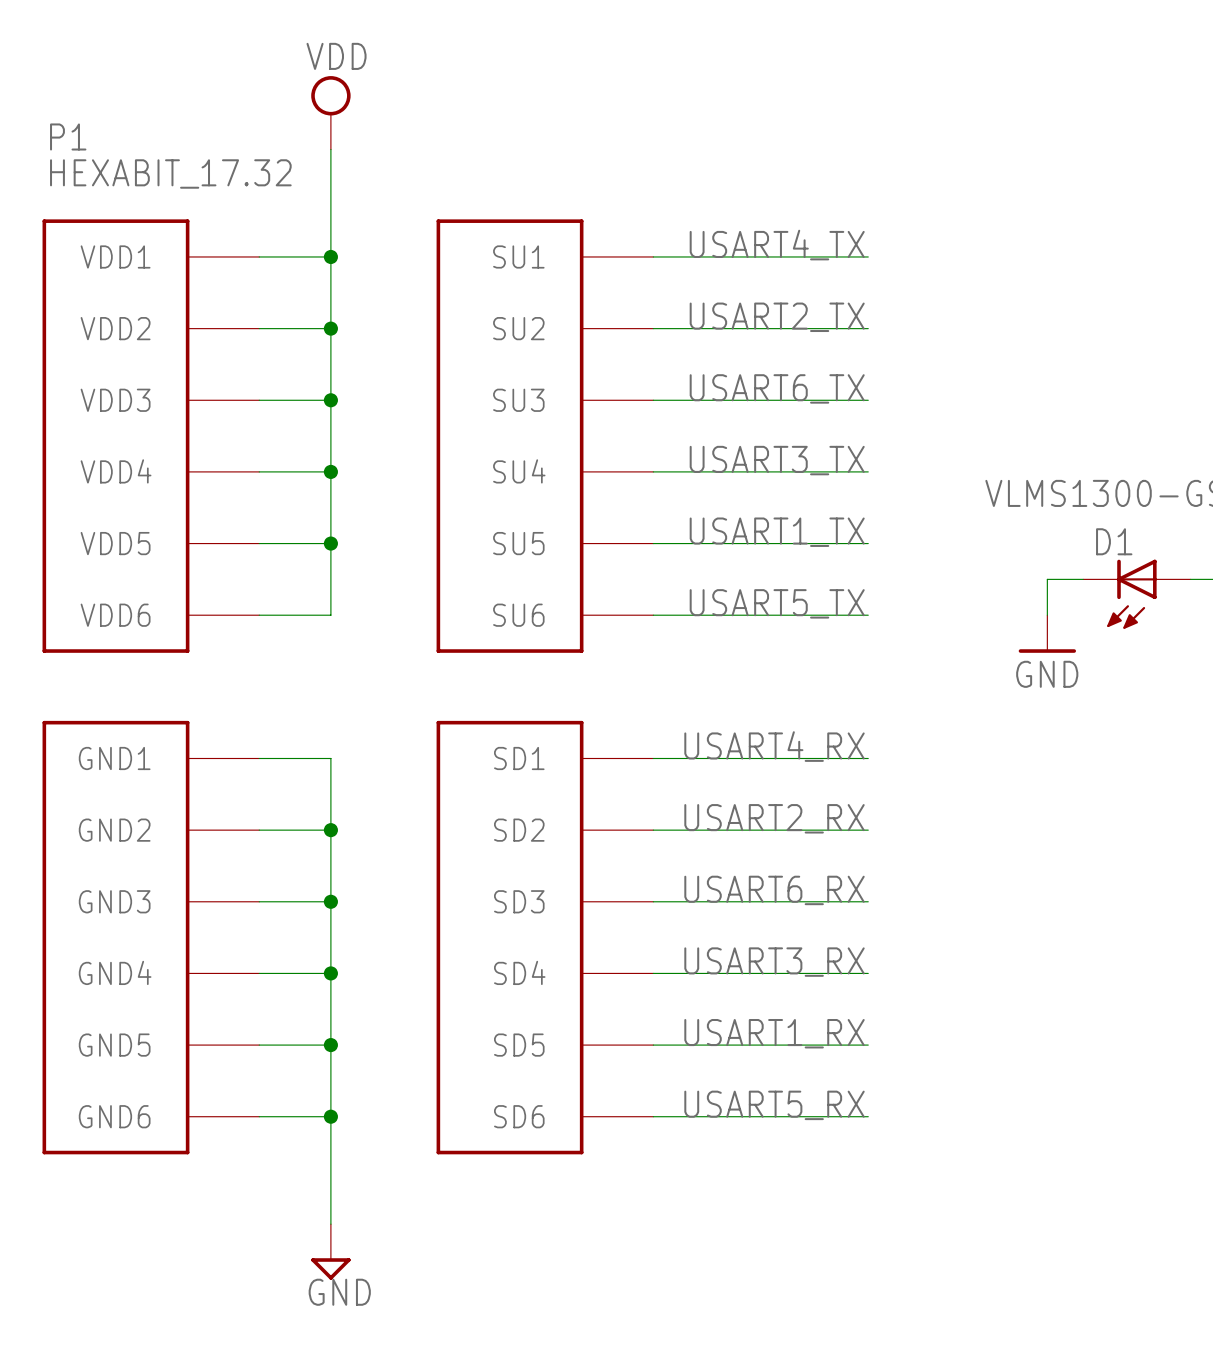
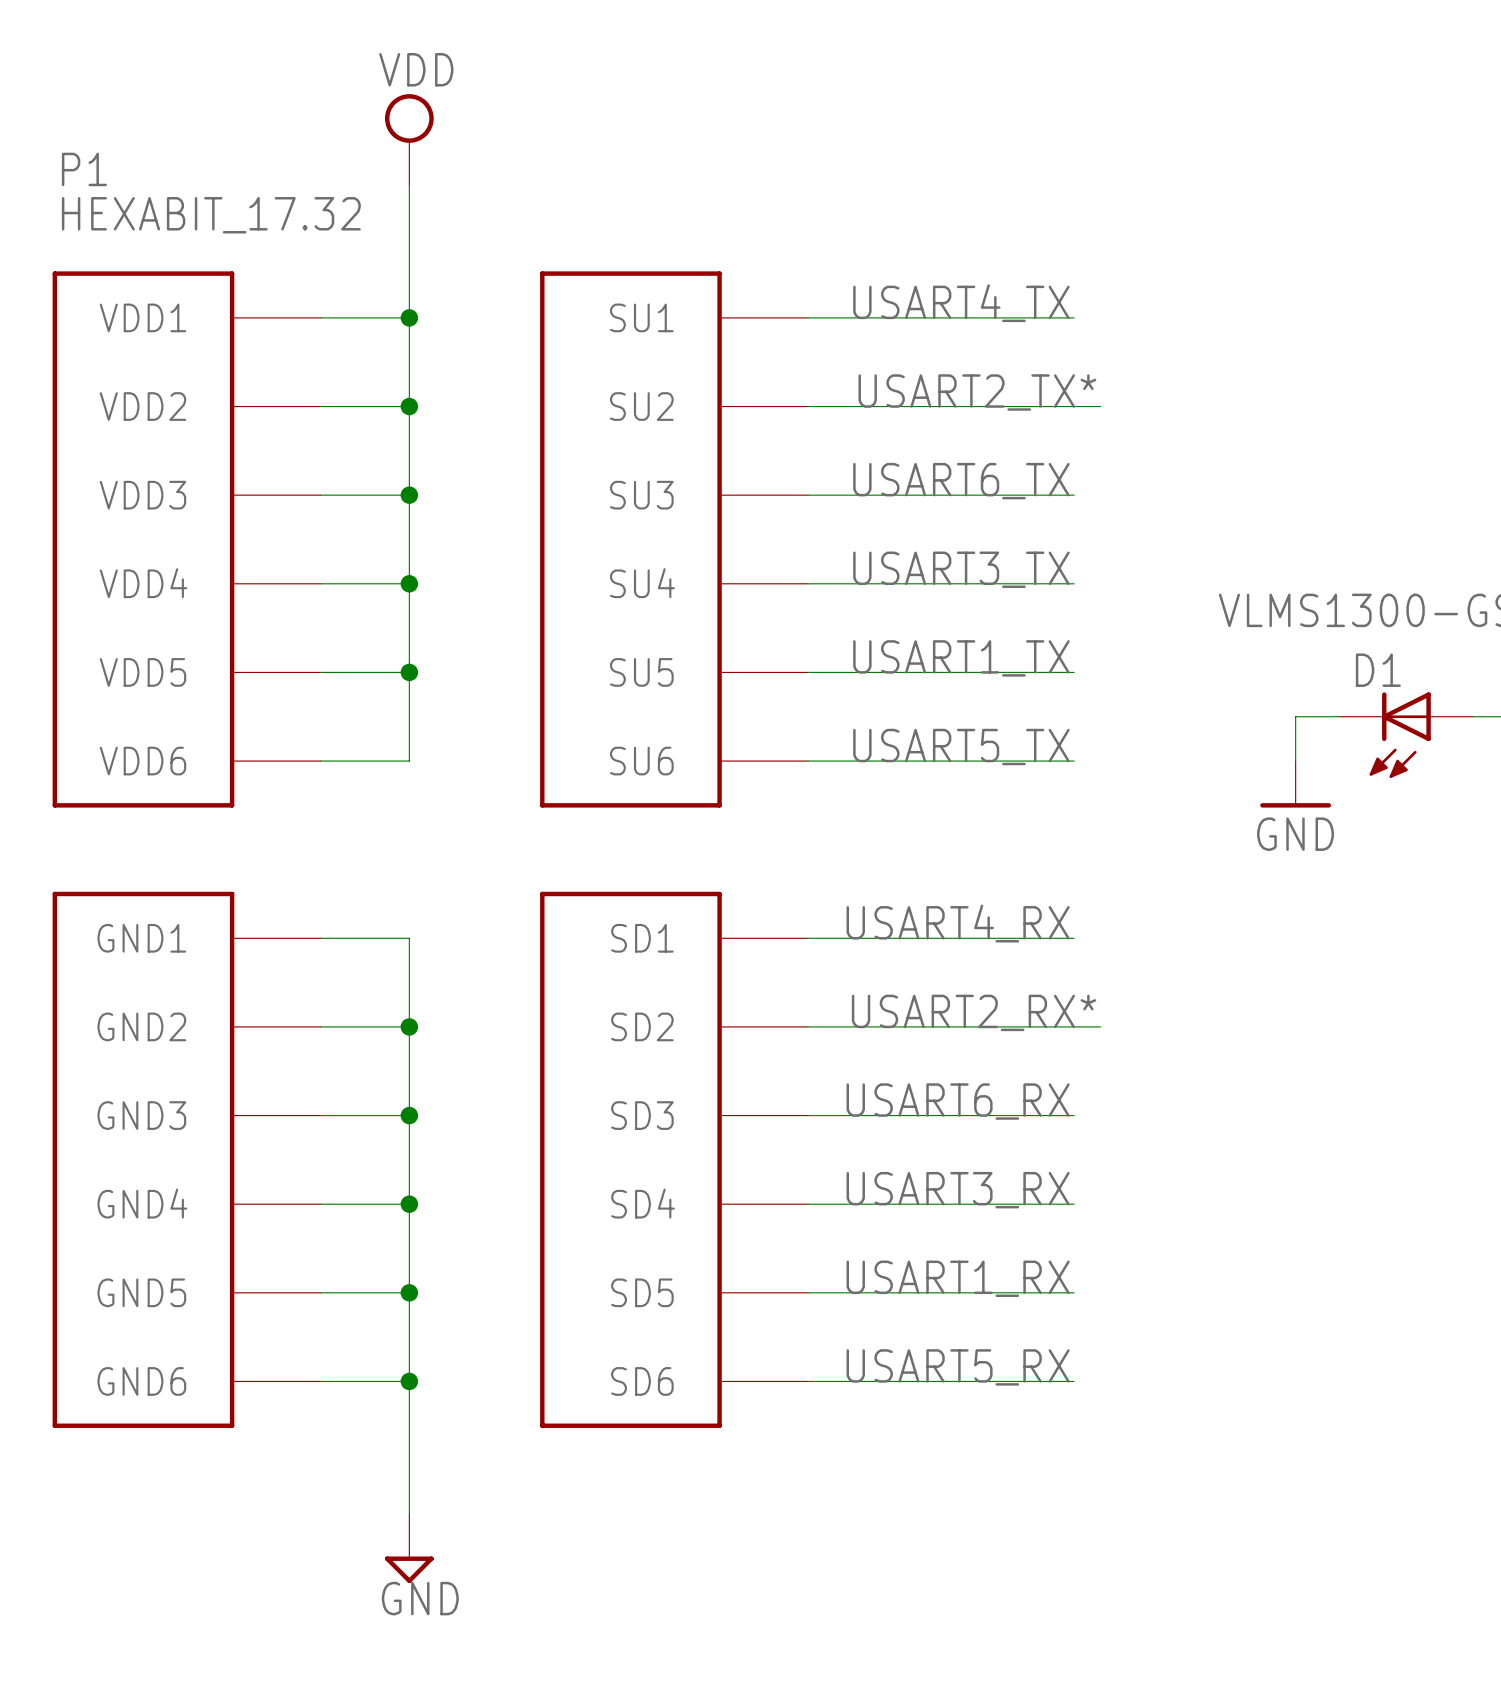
label: USART2_TX (777, 317) -> USART2_TX* (977, 392)
wire: none -> (1074, 406) (1100, 406)
label: USART2_RX (774, 818) -> USART2_RX* (974, 1012)
wire: none -> (1074, 1026) (1100, 1026)

